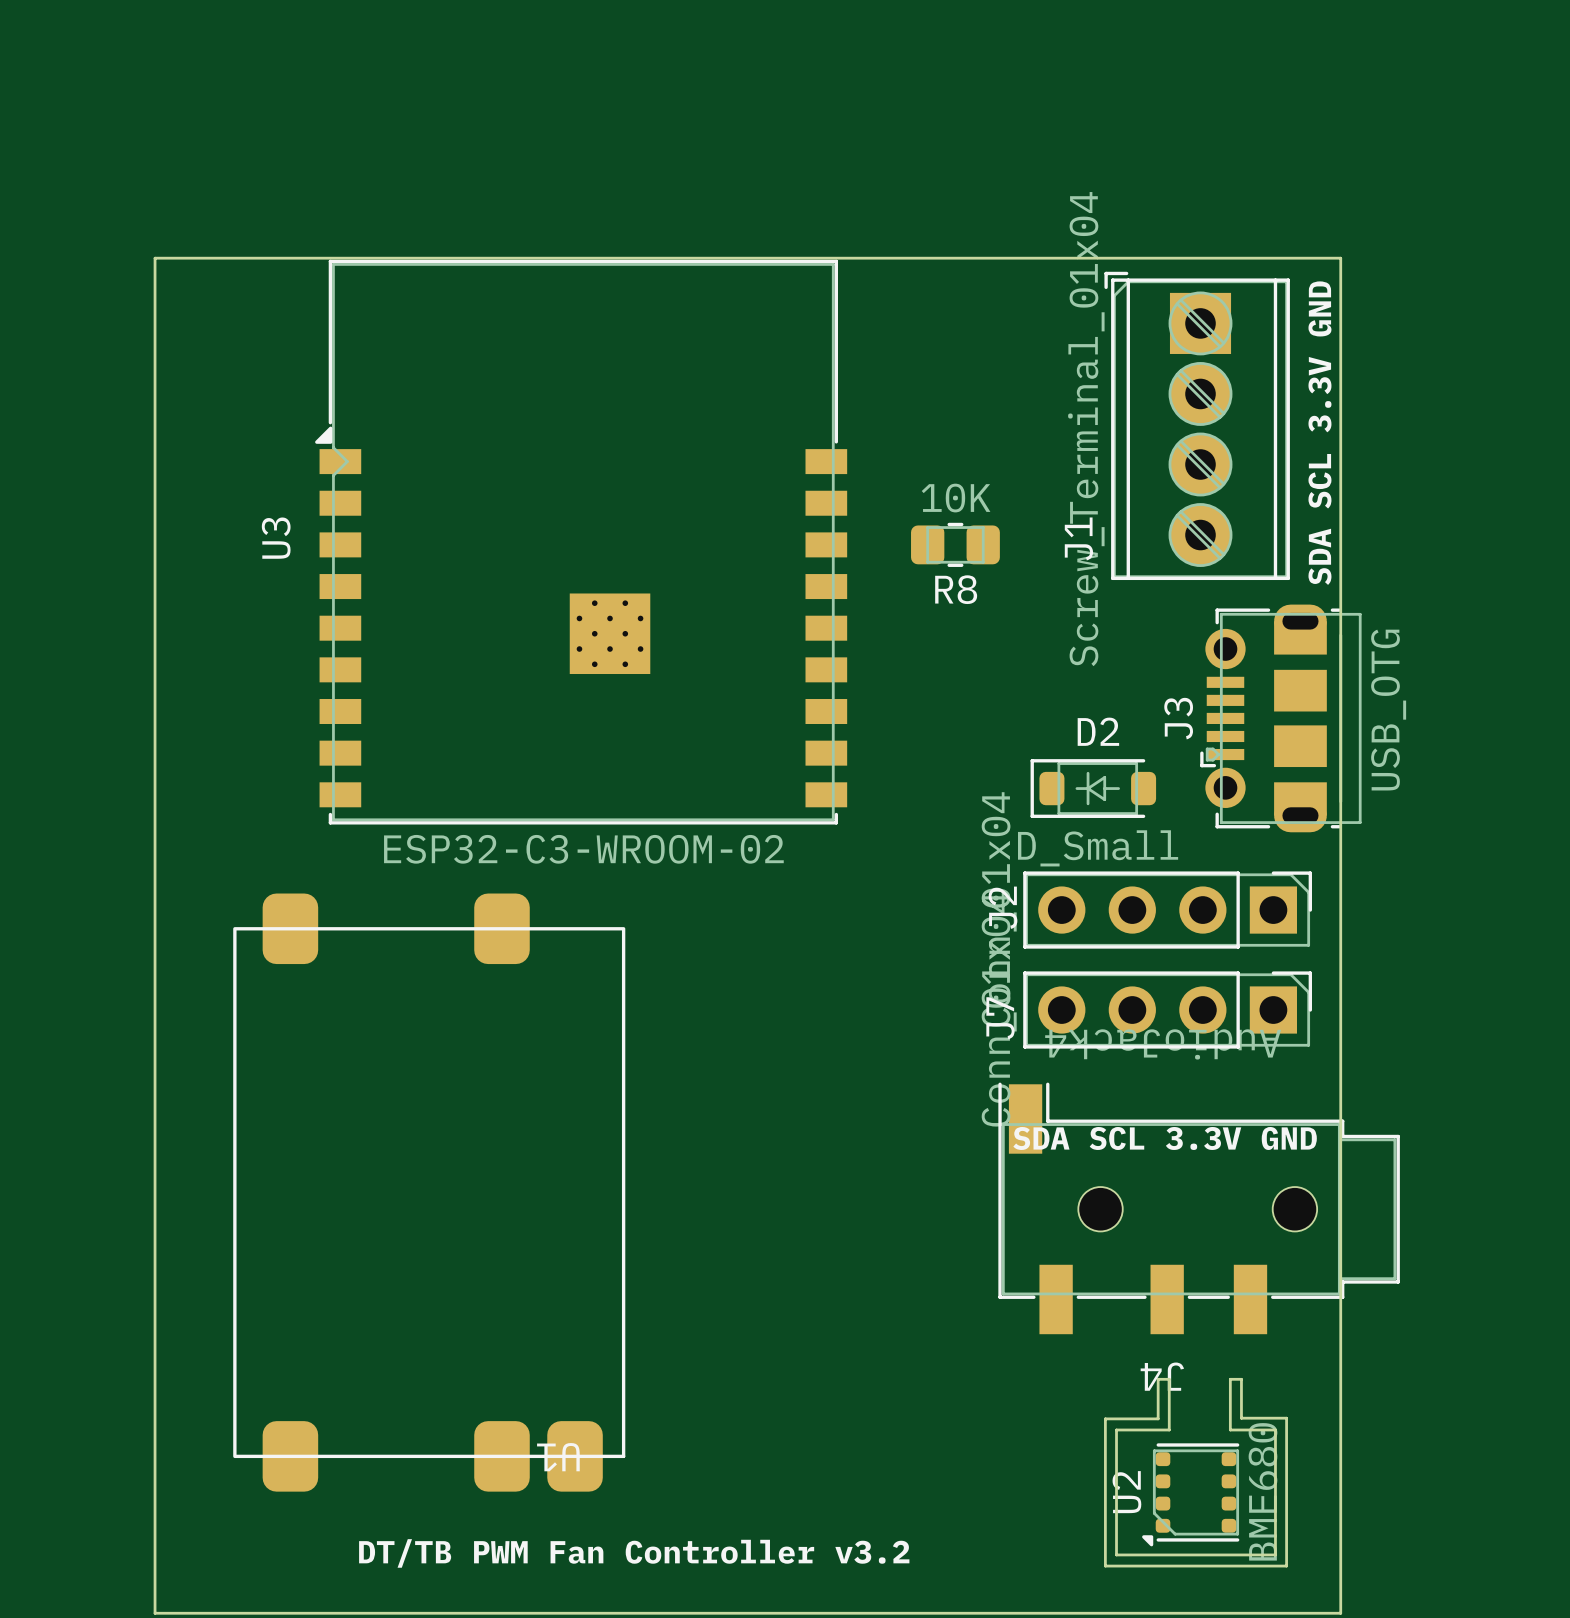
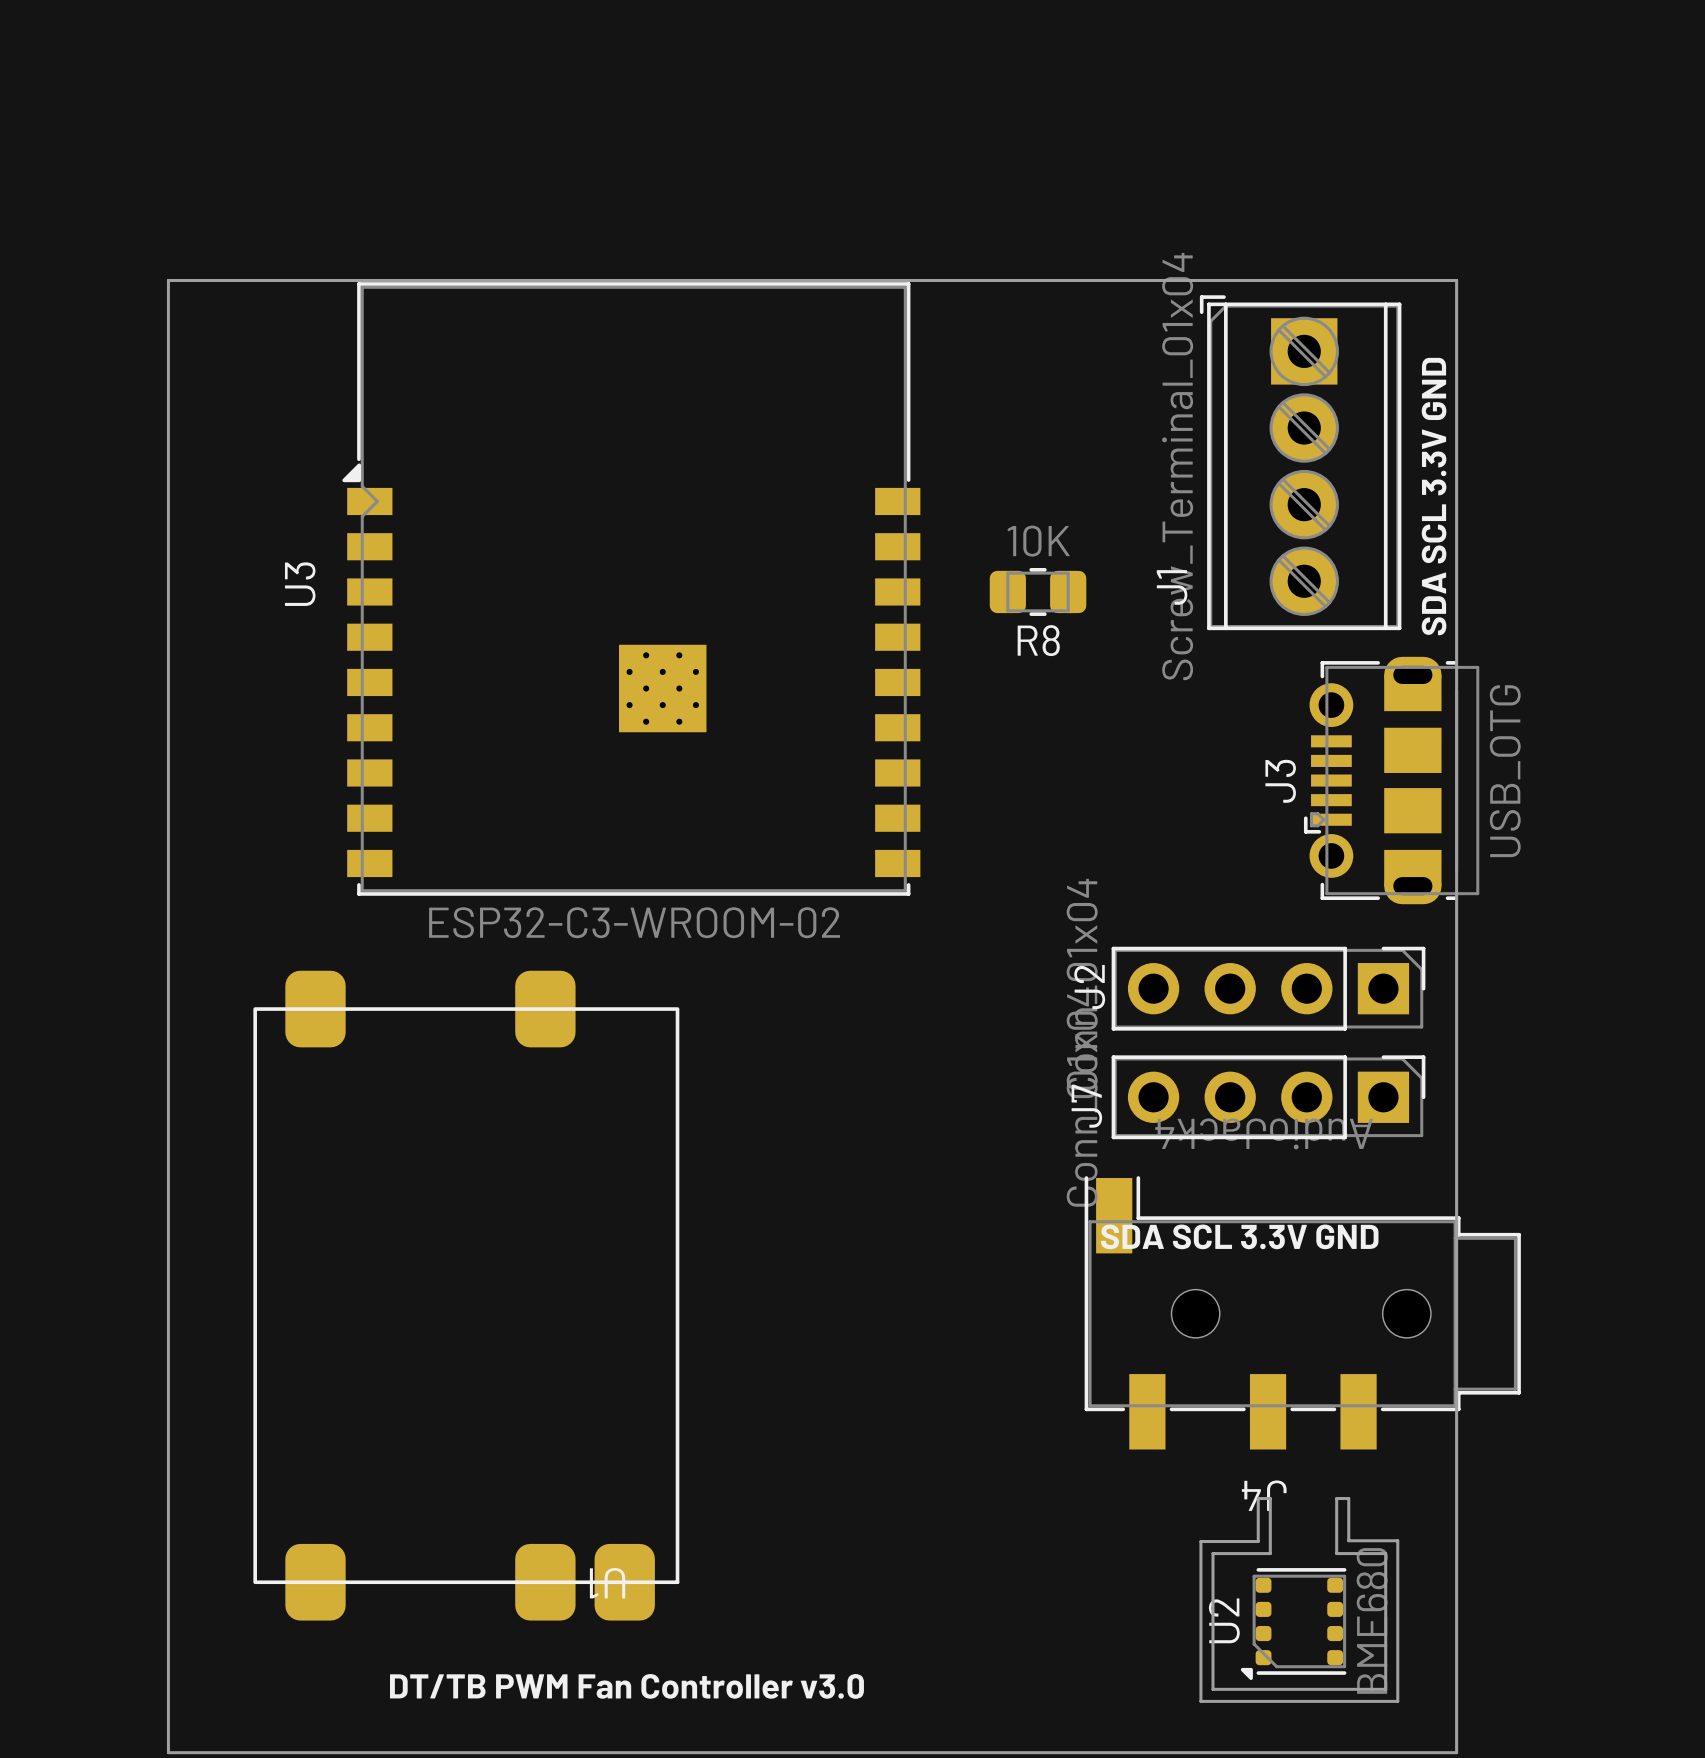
D2: D_Small (1093, 788) -> none
text: DT/TB PWM Fan Controller v3.2 (634, 1553) -> DT/TB PWM Fan Controller v3.0 (626, 1686)

